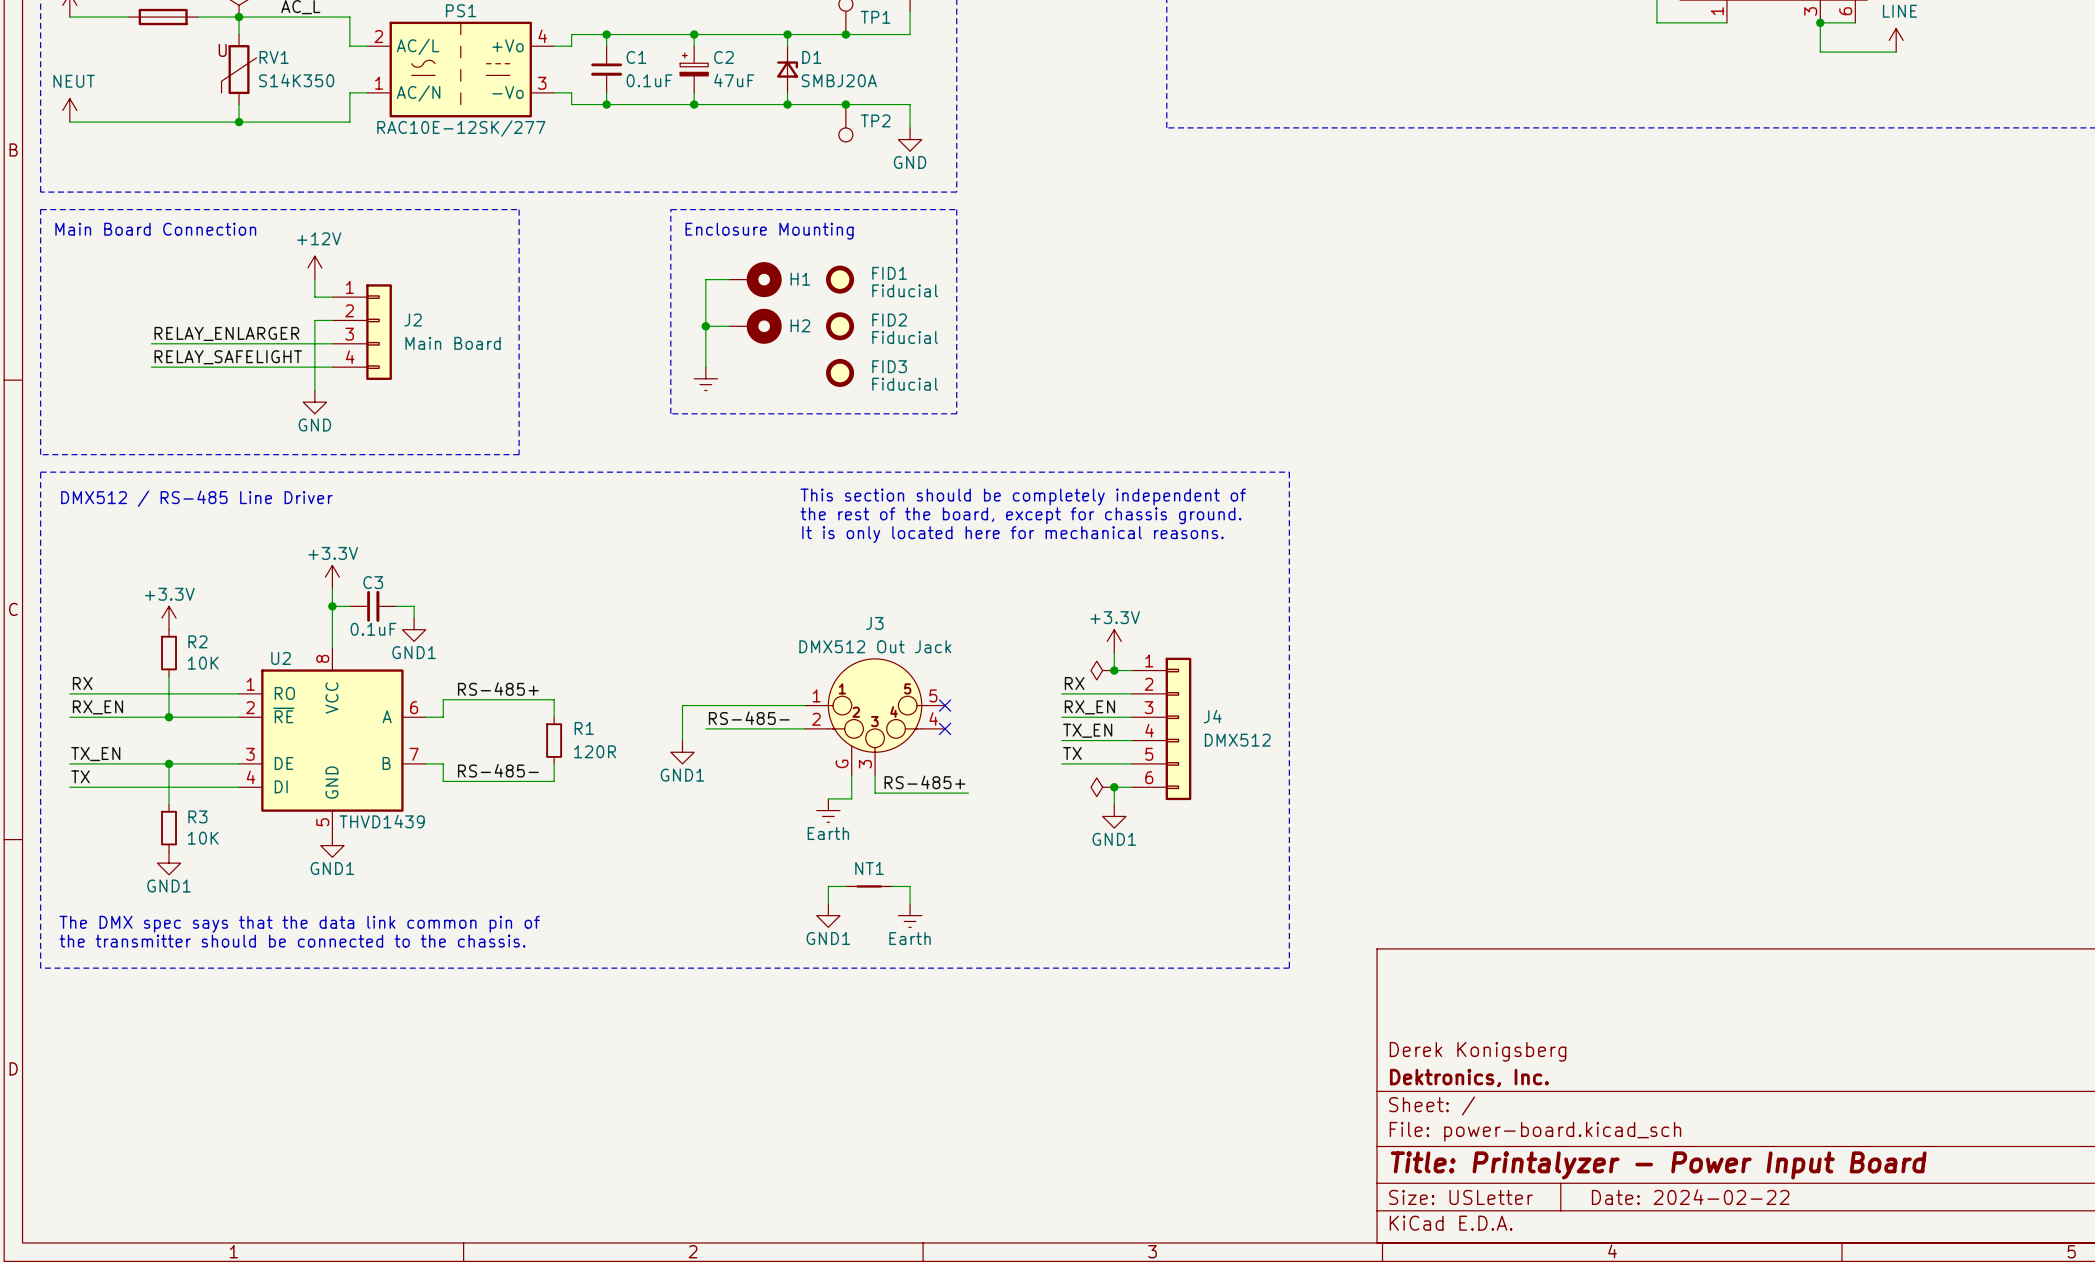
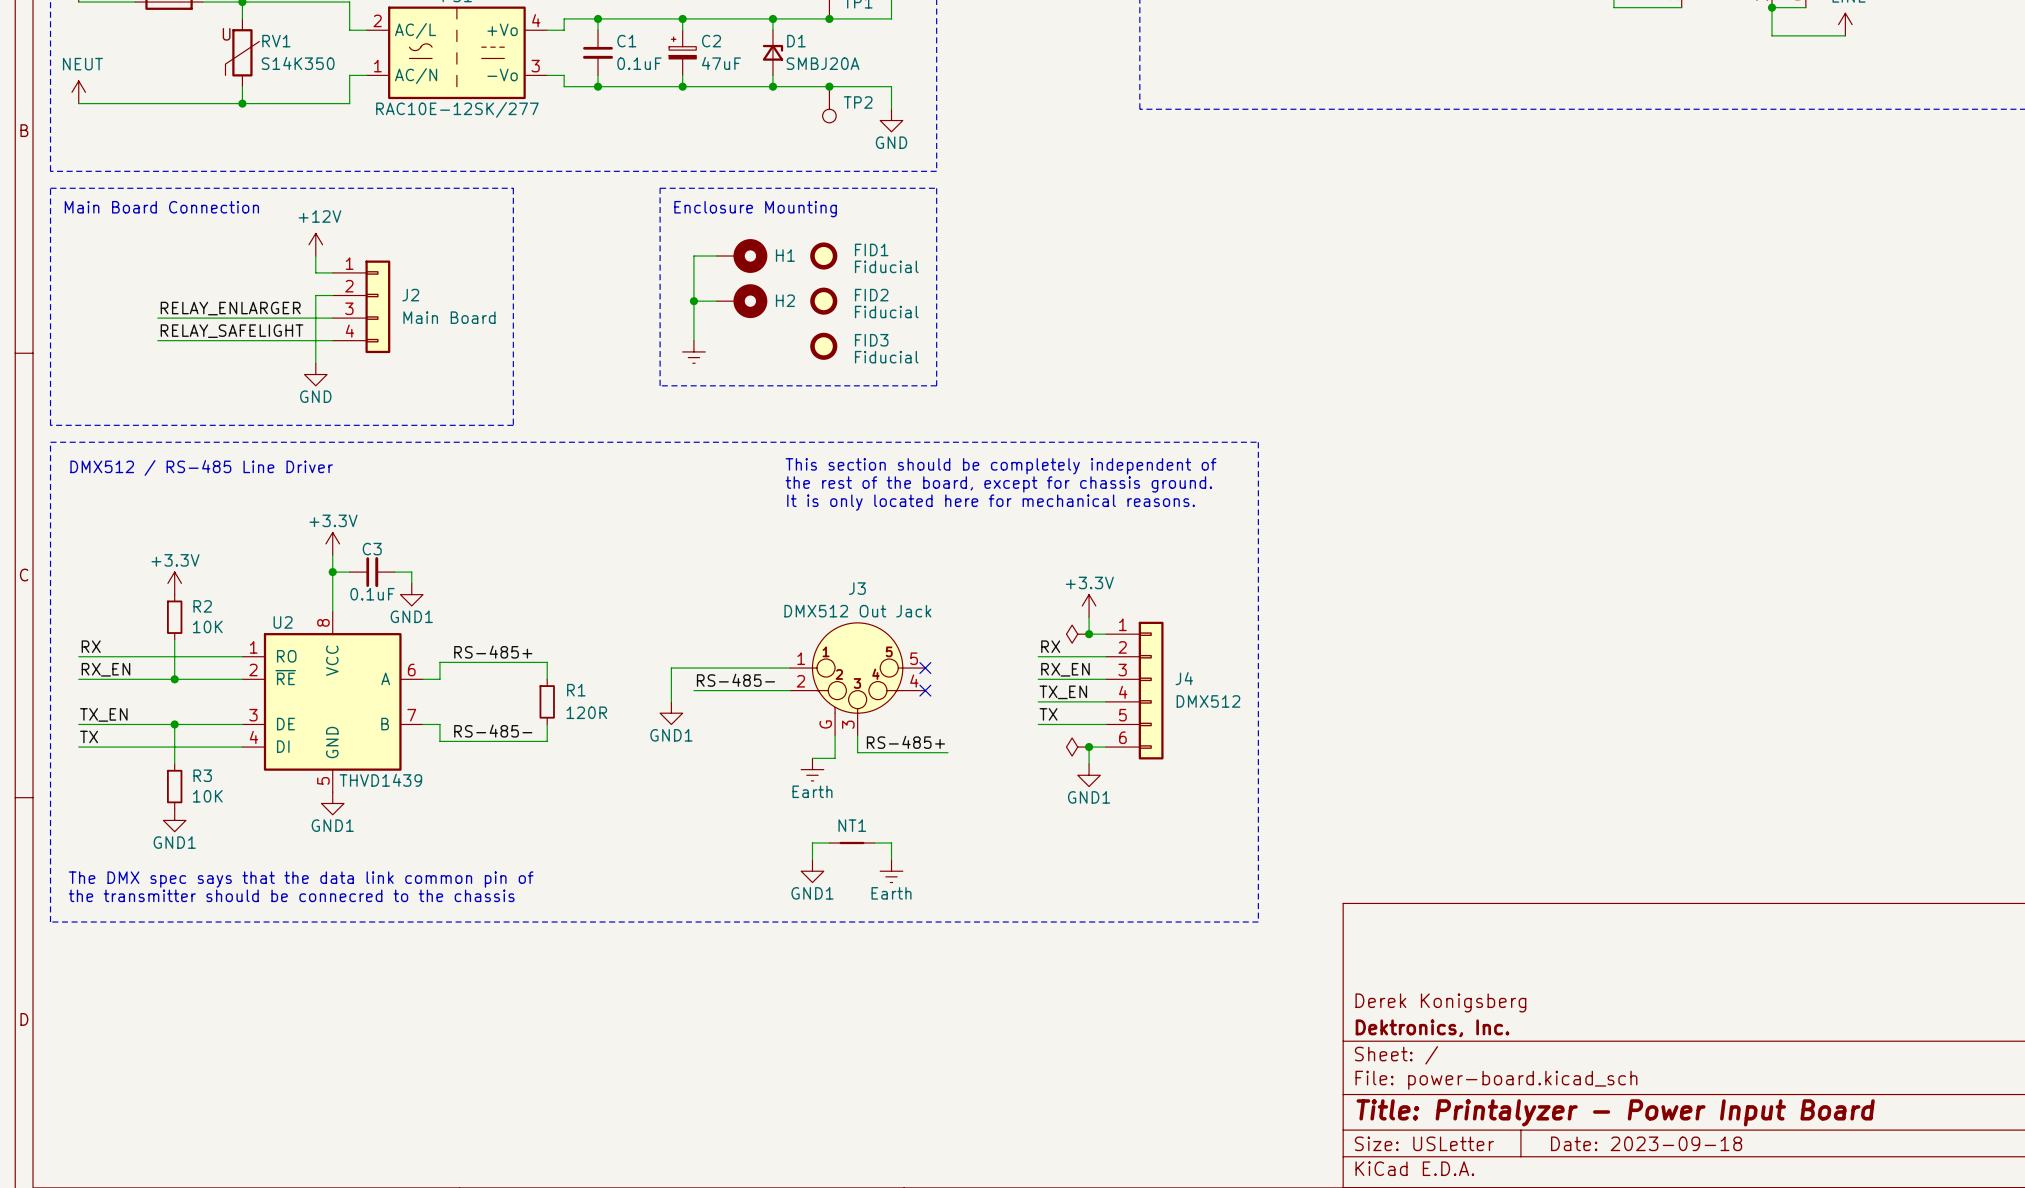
text: the transmitter should be connected to the chassis. (292, 941) -> the transmitter should be connecred to the chassis (291, 895)
title block: Date: 2024-02-22 (1690, 1197) -> Date: 2023-09-18 (1646, 1143)

